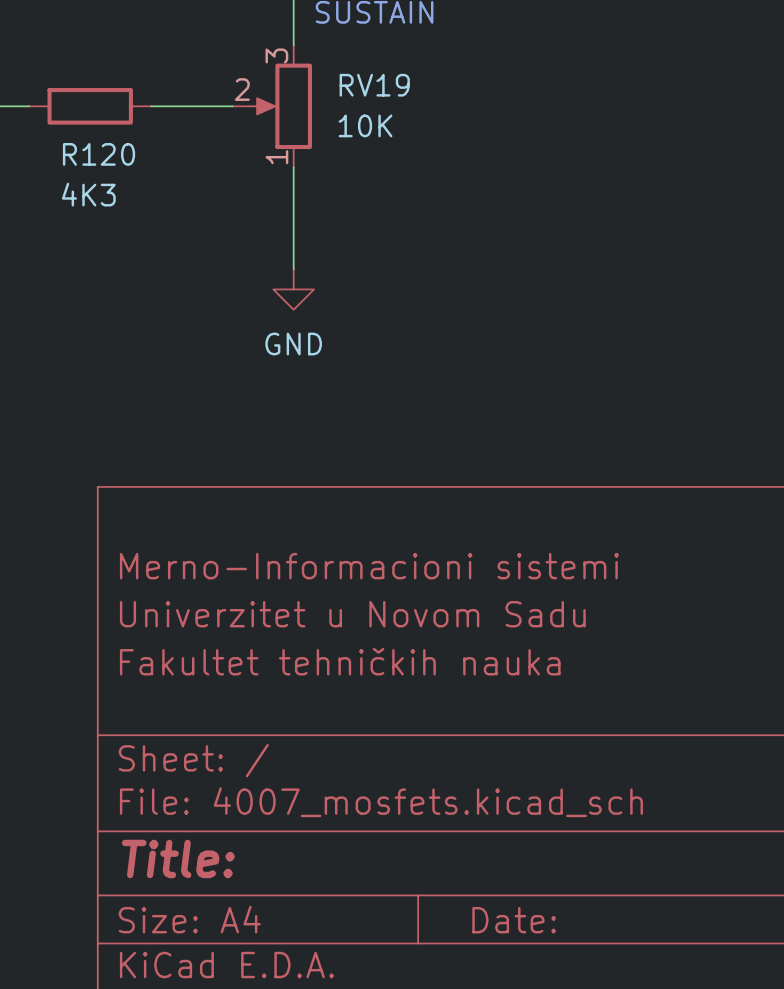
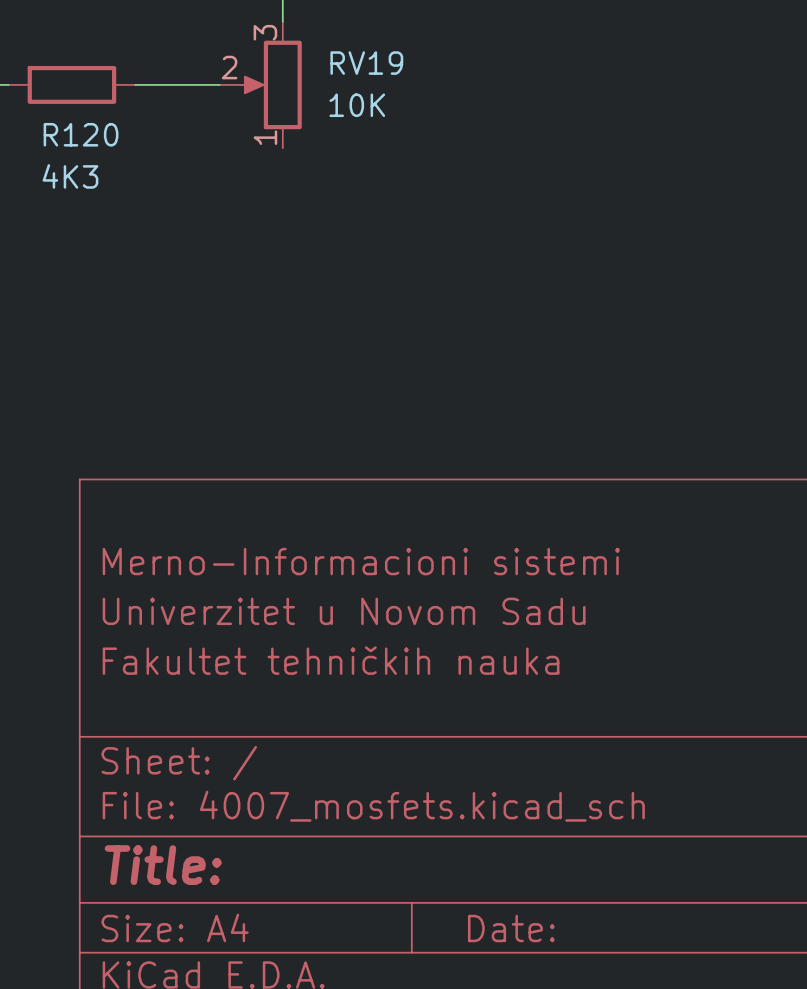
wire: (293, 167) (293, 269) -> none
power symbol: GND (293, 289) -> none

